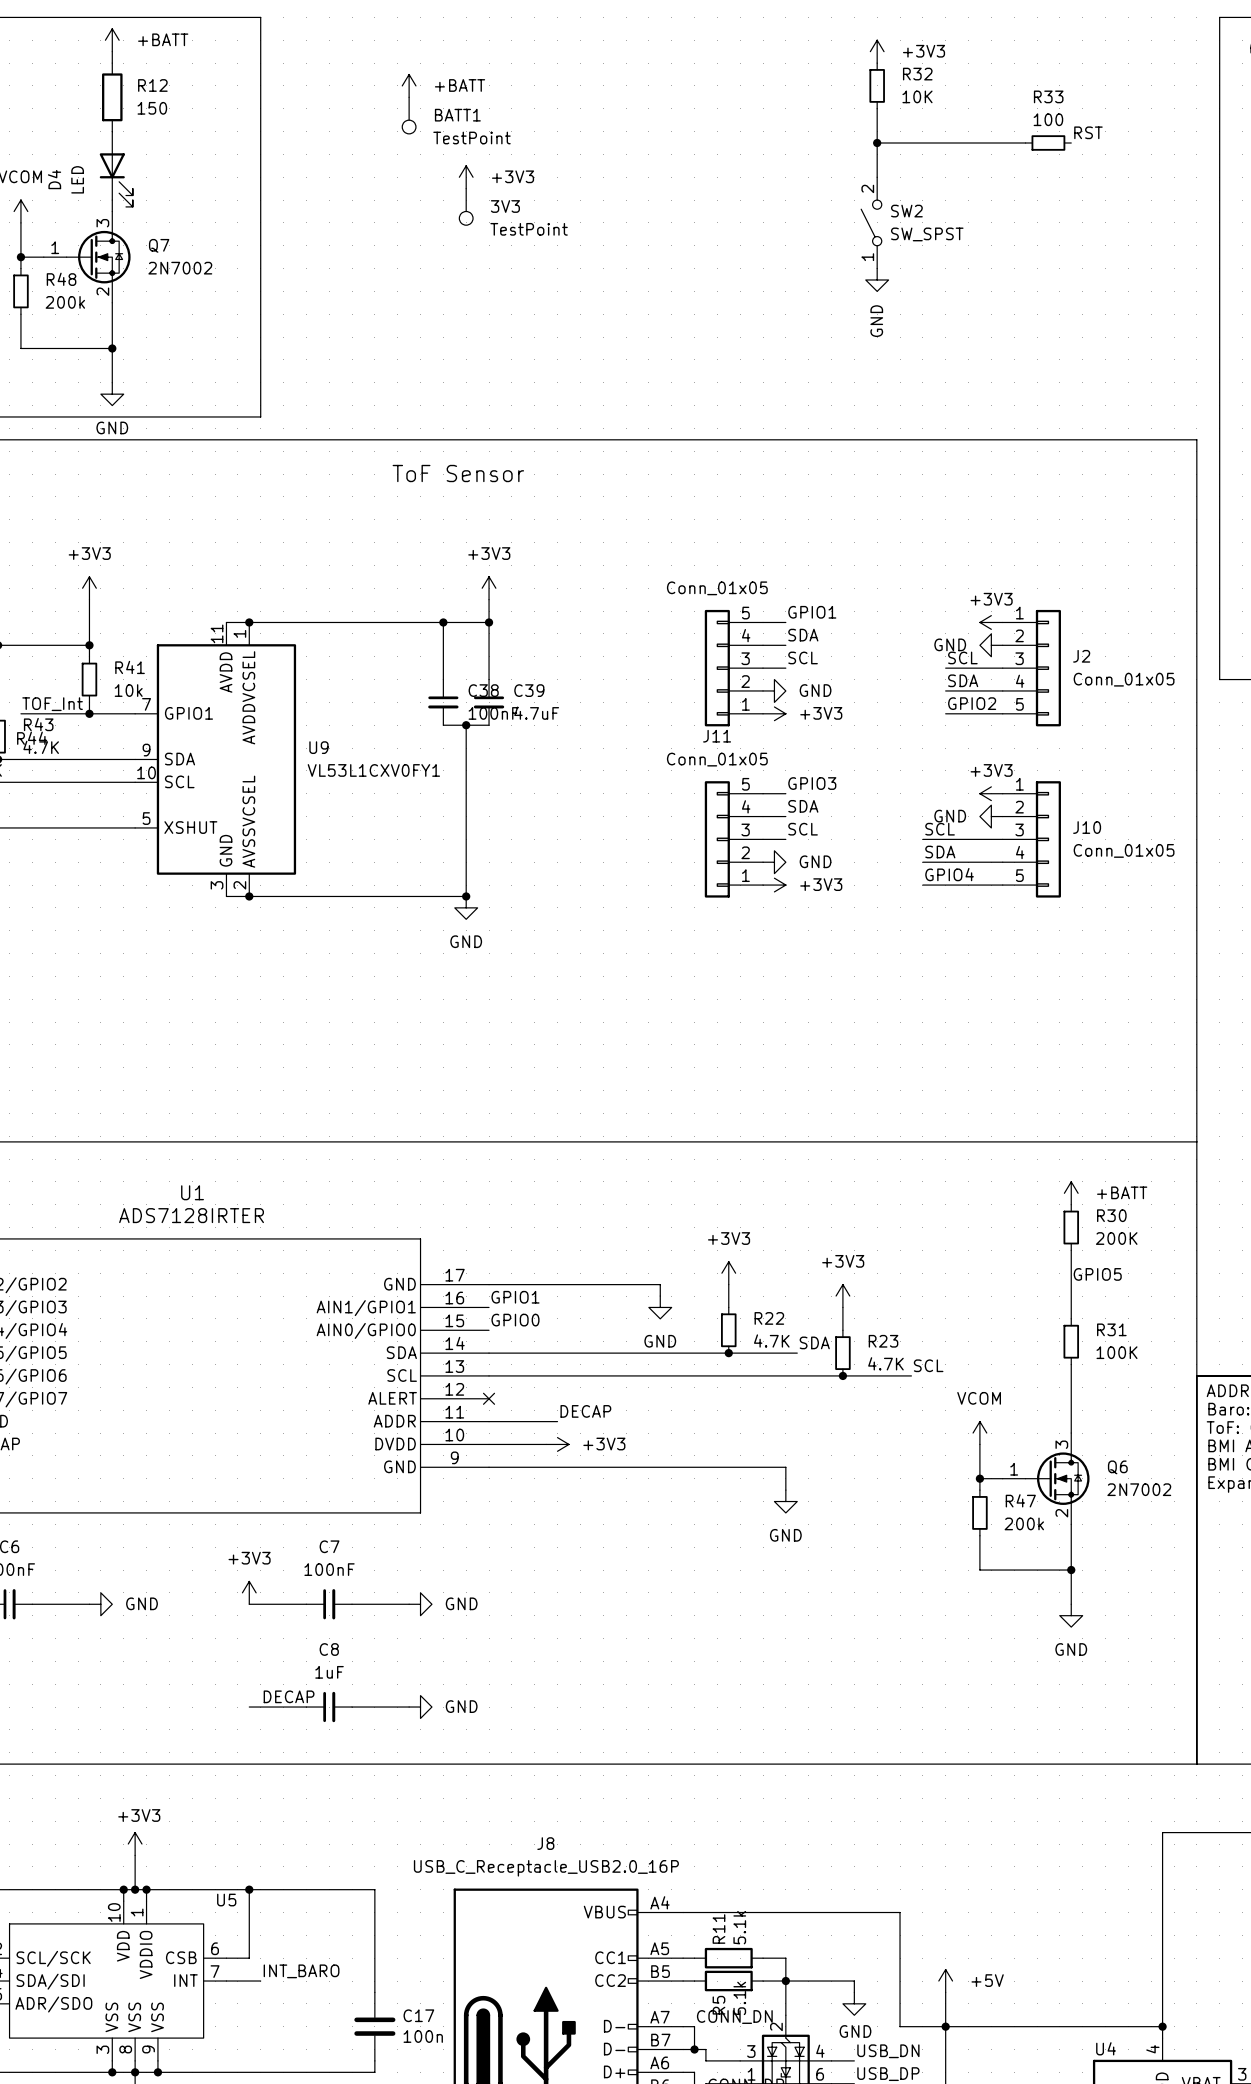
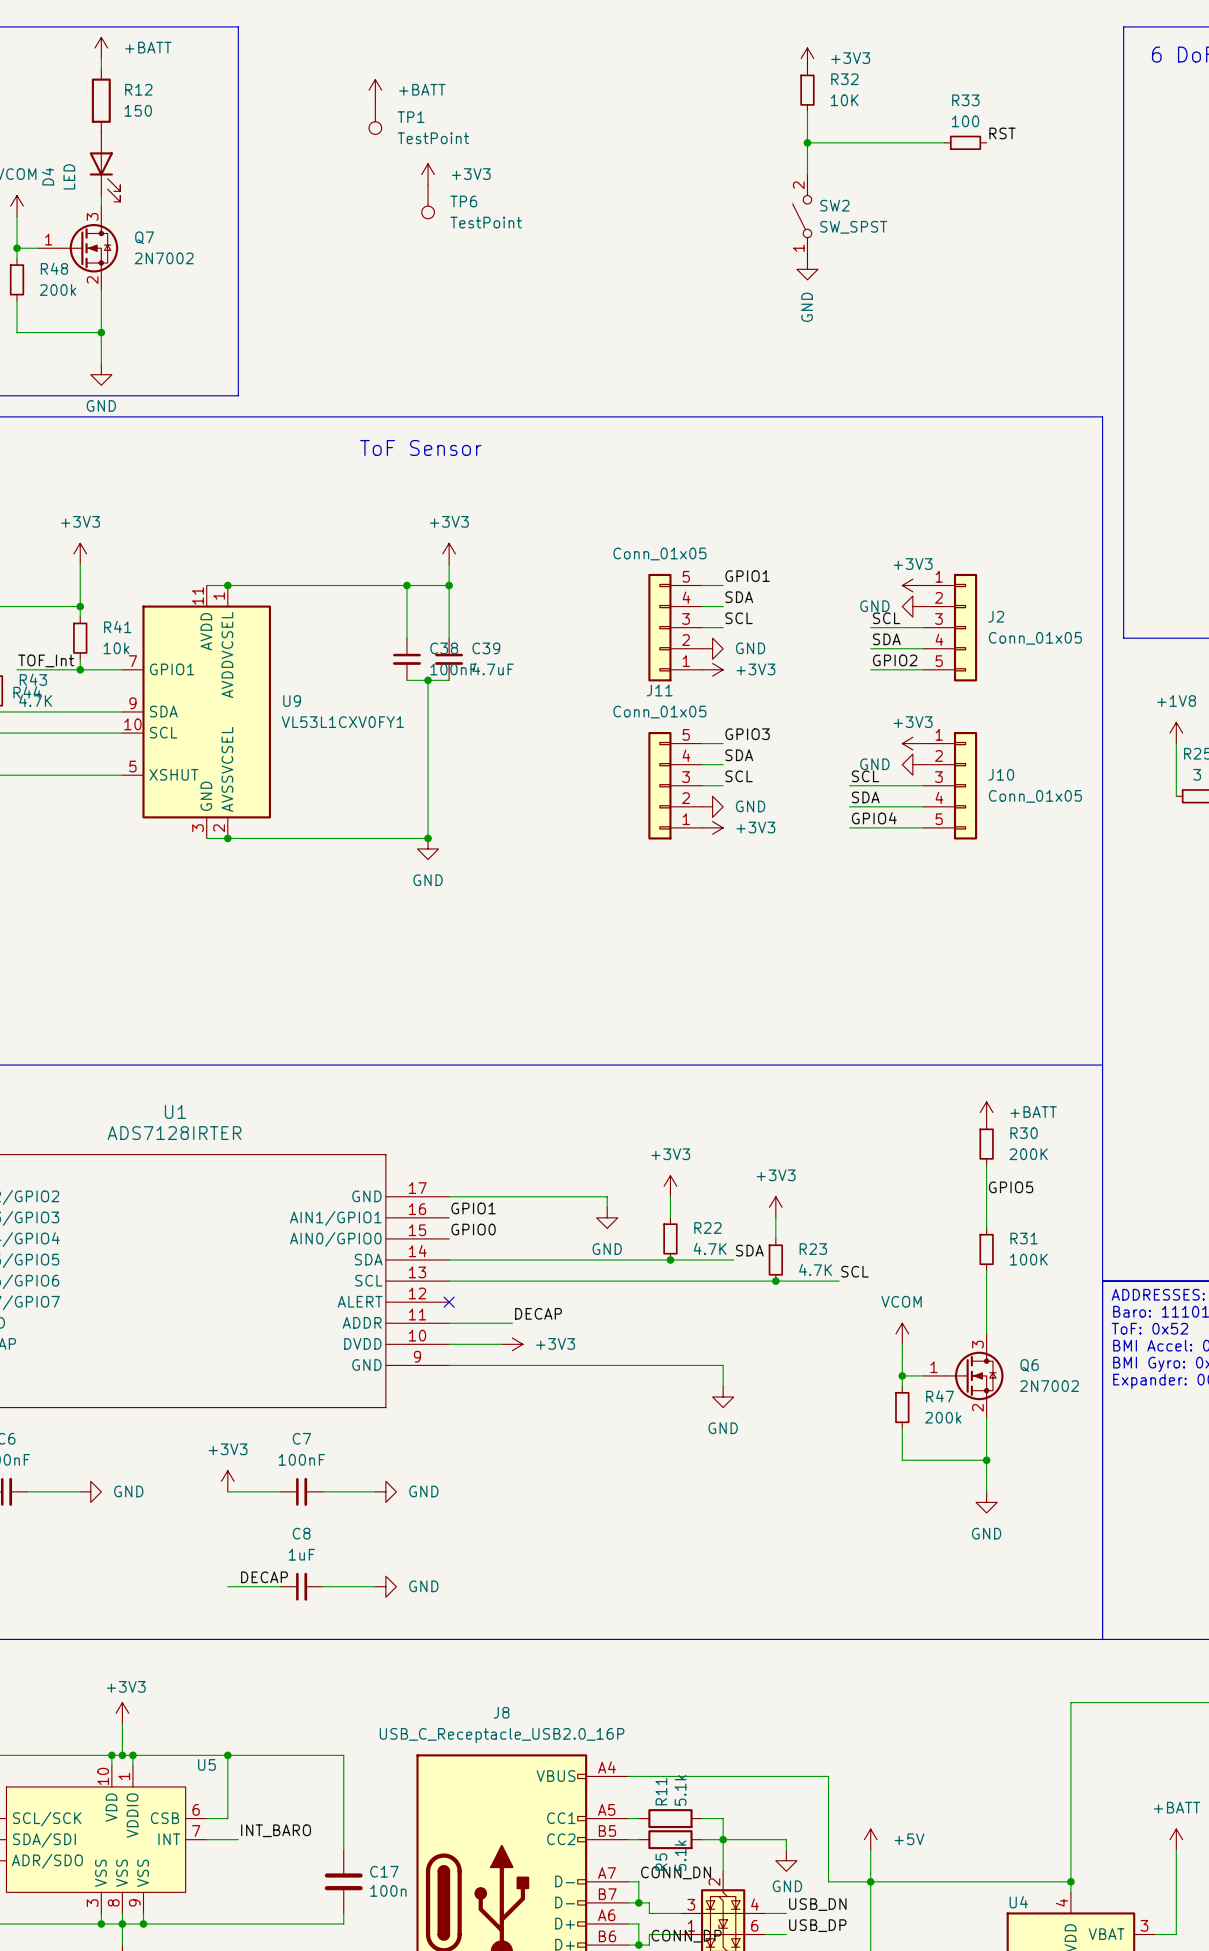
BATT1 name: BATT1 (457, 115) -> TP1 (411, 117)
3V3 name: 3V3 (505, 206) -> TP6 (463, 201)

